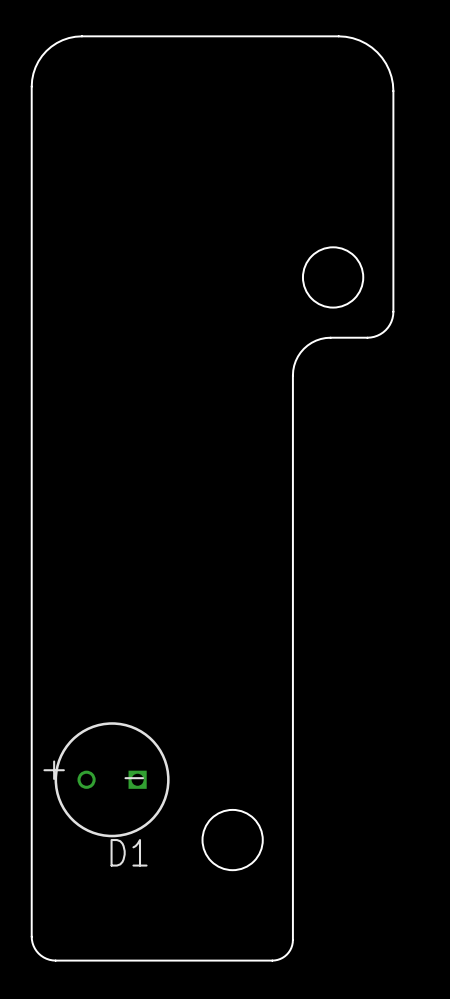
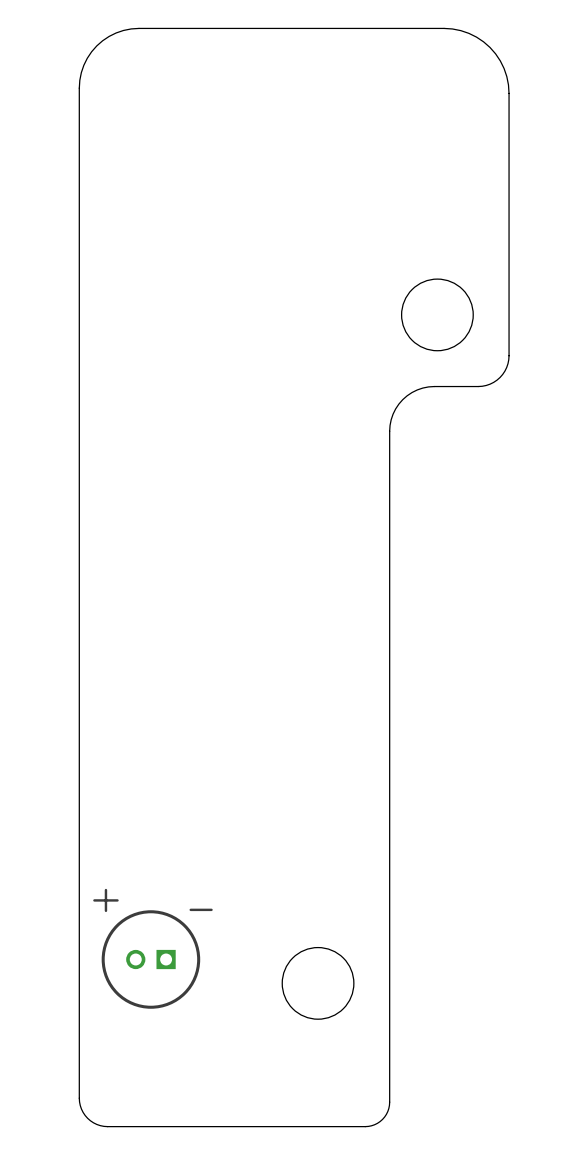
D1: (112, 779) -> none
part: none -> (150, 959)

